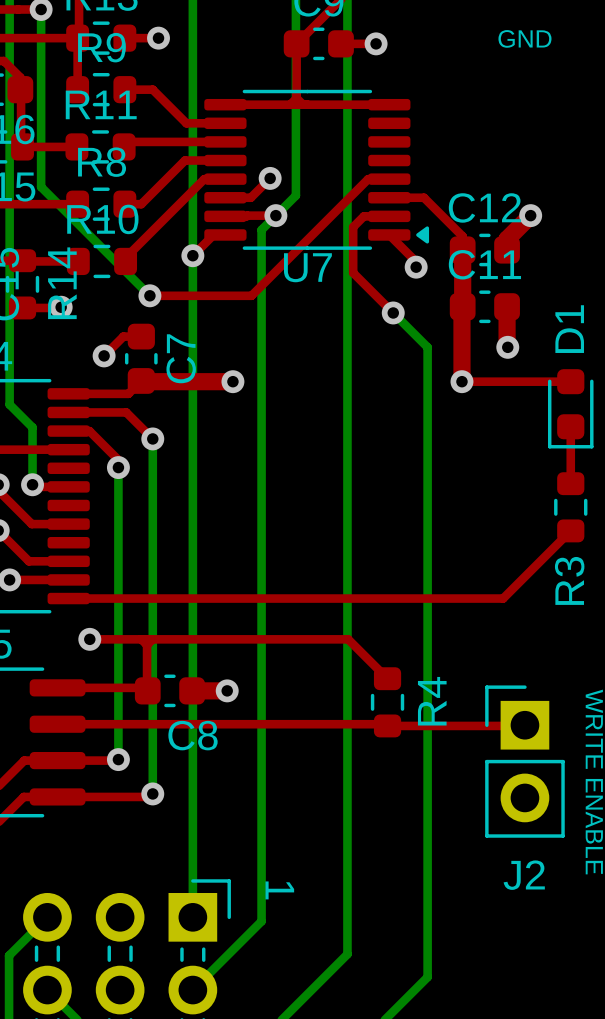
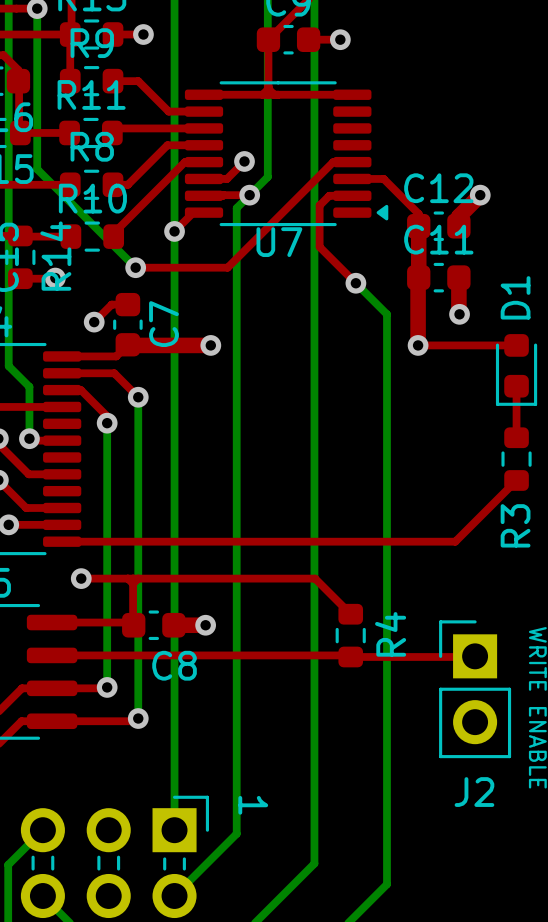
text: GND (524, 38) -> none
top track: (389, 234) (416, 261) (416, 267) -> none
via: (416, 267) -> none

